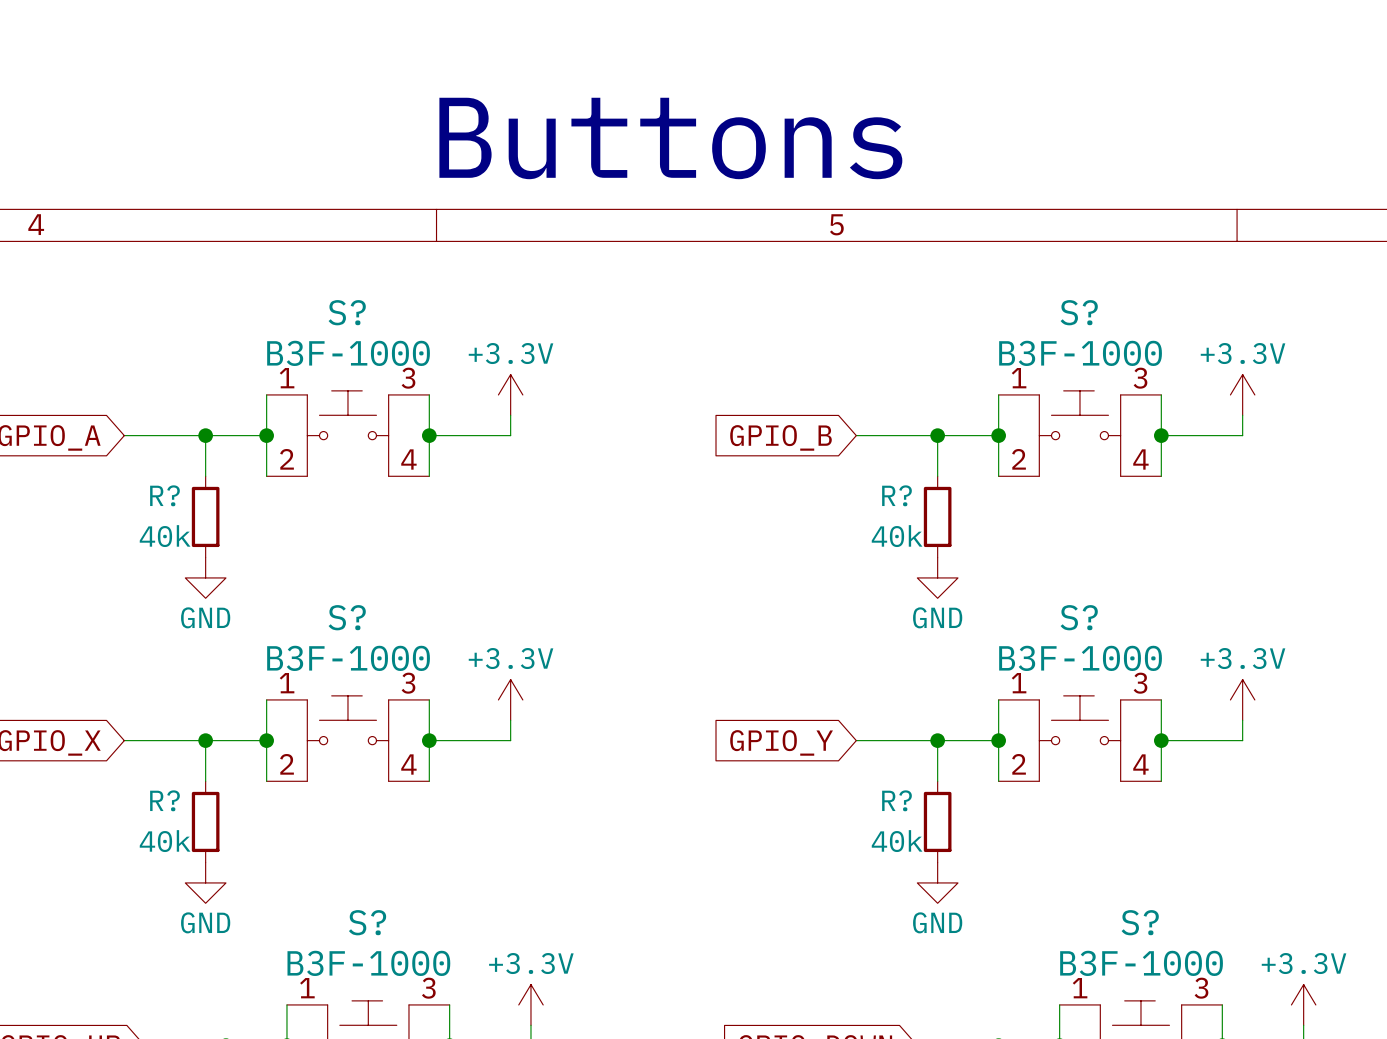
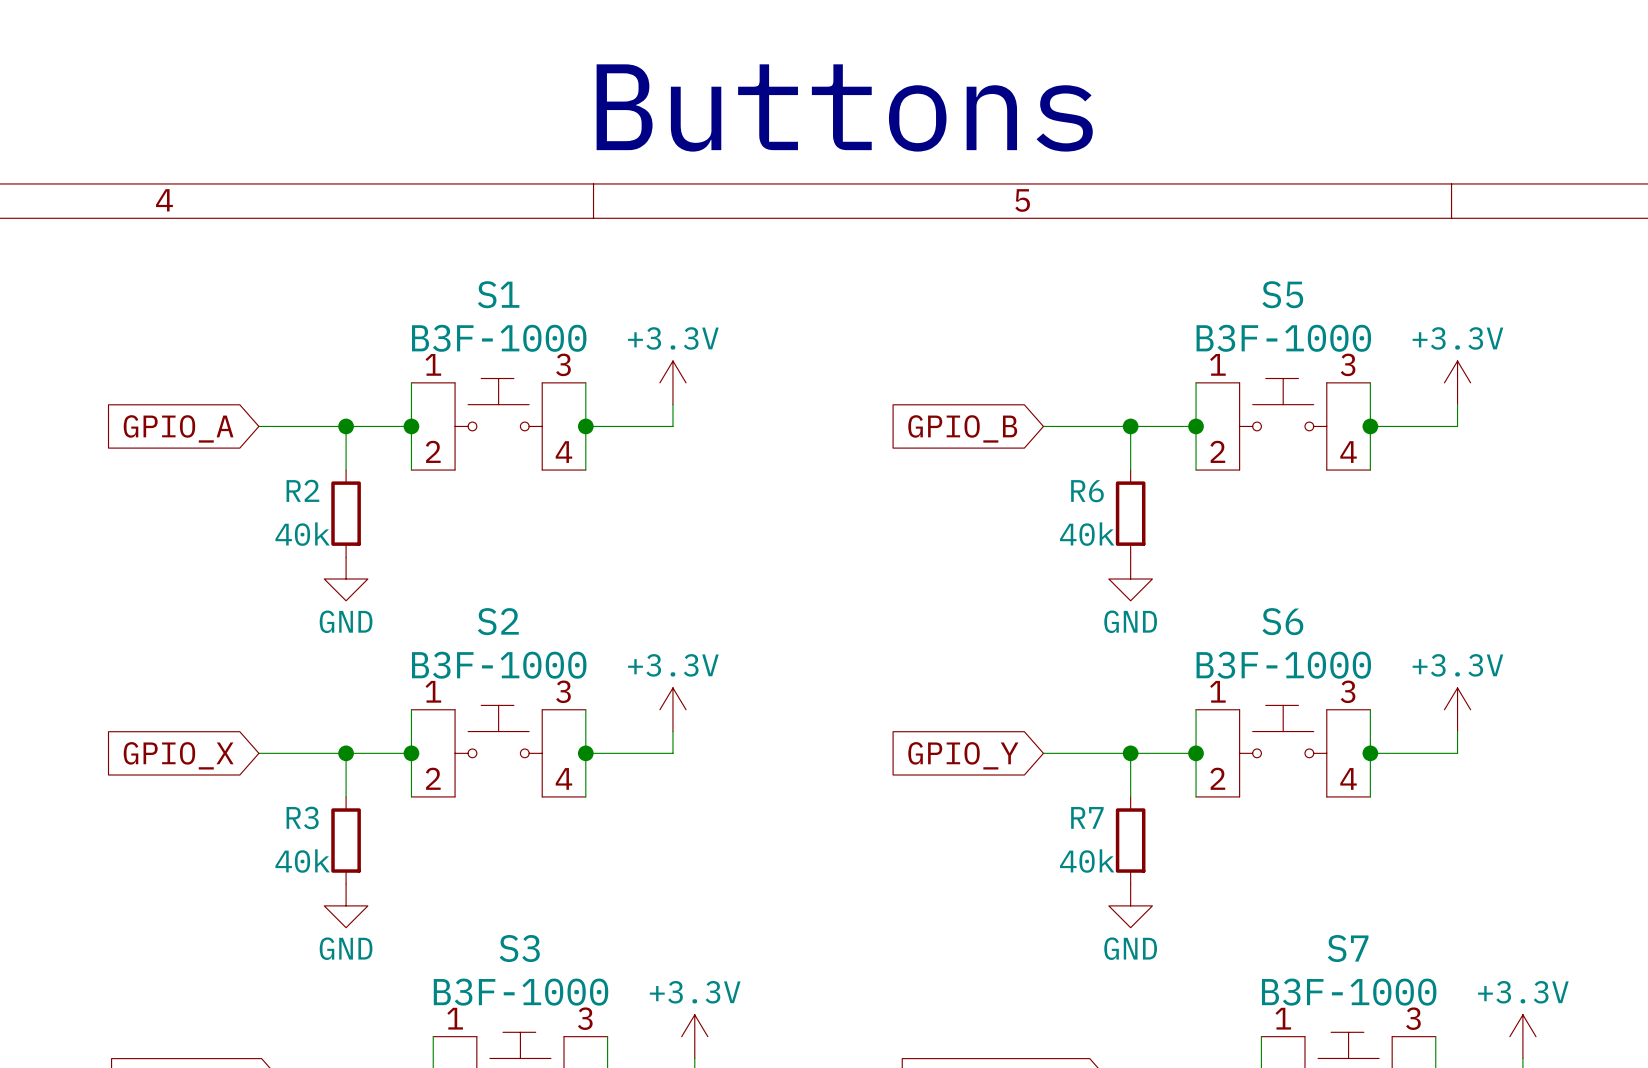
S? name: S? (347, 312) -> S1 (498, 294)
S? name: S? (1079, 312) -> S5 (1282, 294)
R? name: R? (164, 495) -> R2 (302, 490)
R? name: R? (896, 495) -> R6 (1087, 491)
S? name: S? (347, 617) -> S2 (498, 621)
S? name: S? (1079, 617) -> S6 (1282, 621)
R? name: R? (164, 800) -> R3 (302, 817)
R? name: R? (896, 800) -> R7 (1087, 817)
S? name: S? (367, 922) -> S3 (519, 948)
S? name: S? (1140, 922) -> S7 (1348, 948)

